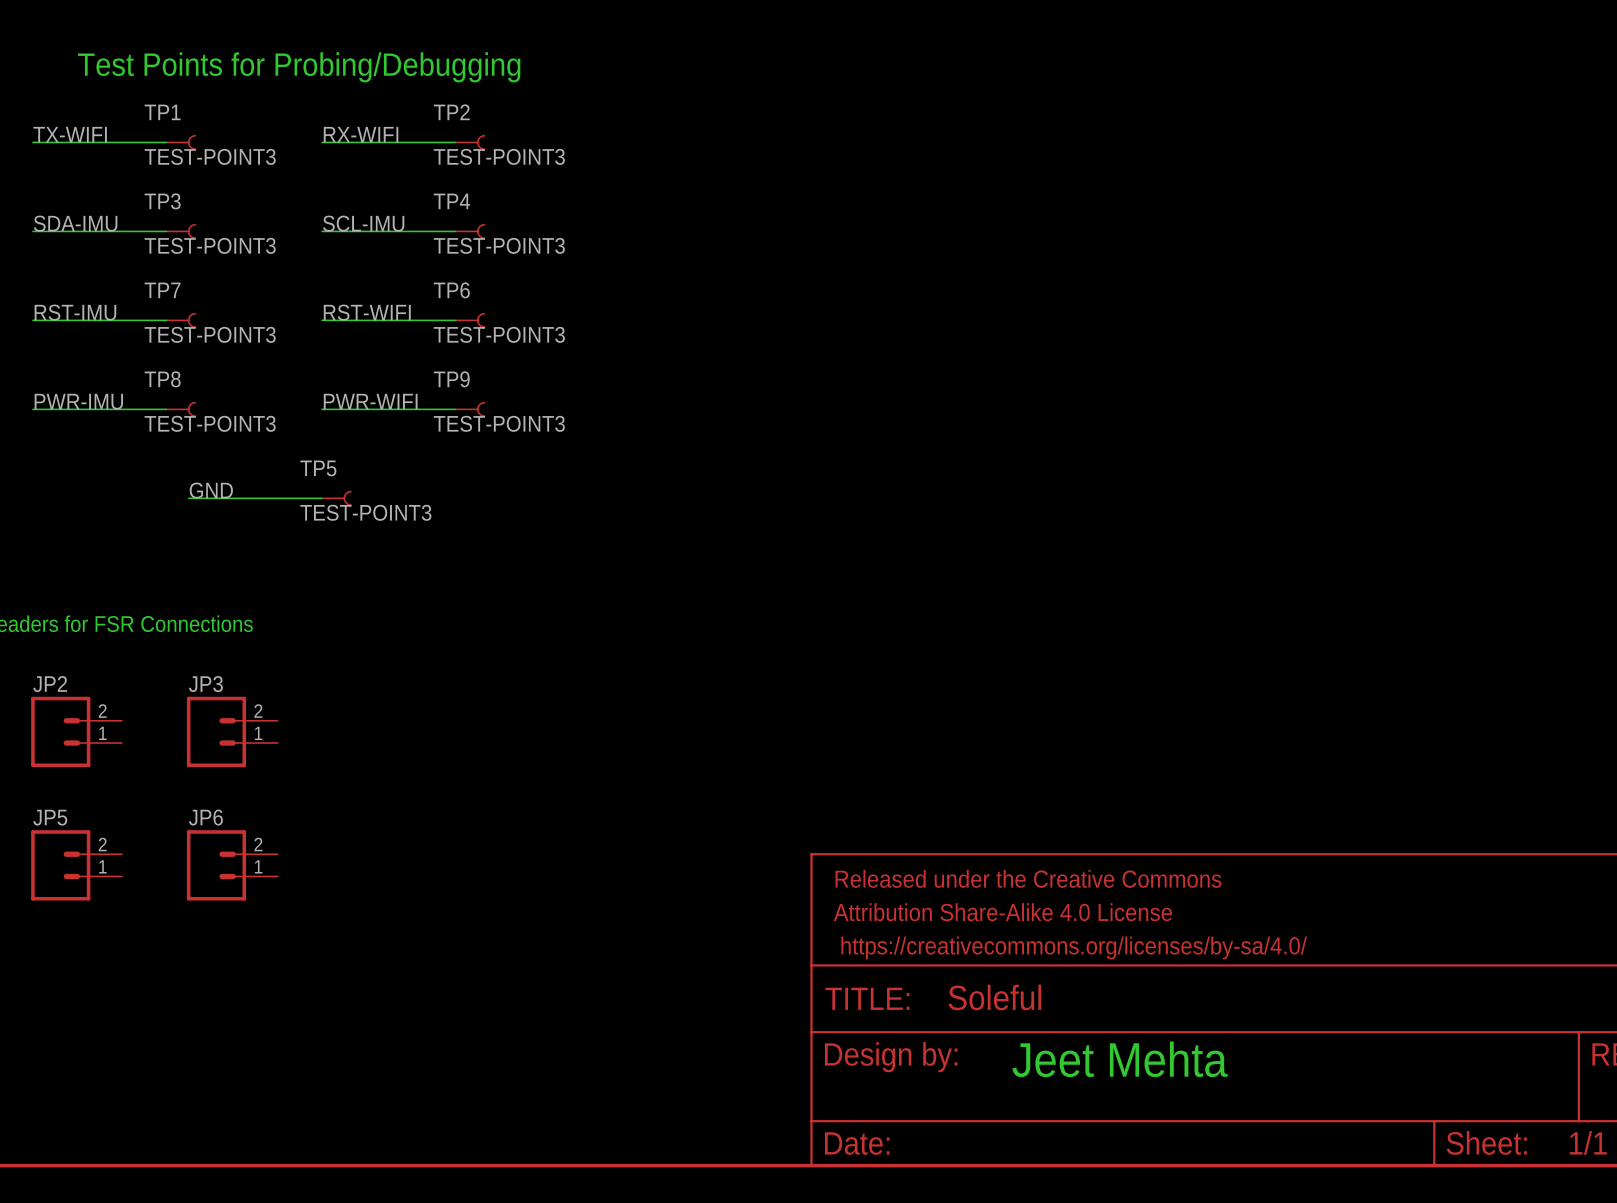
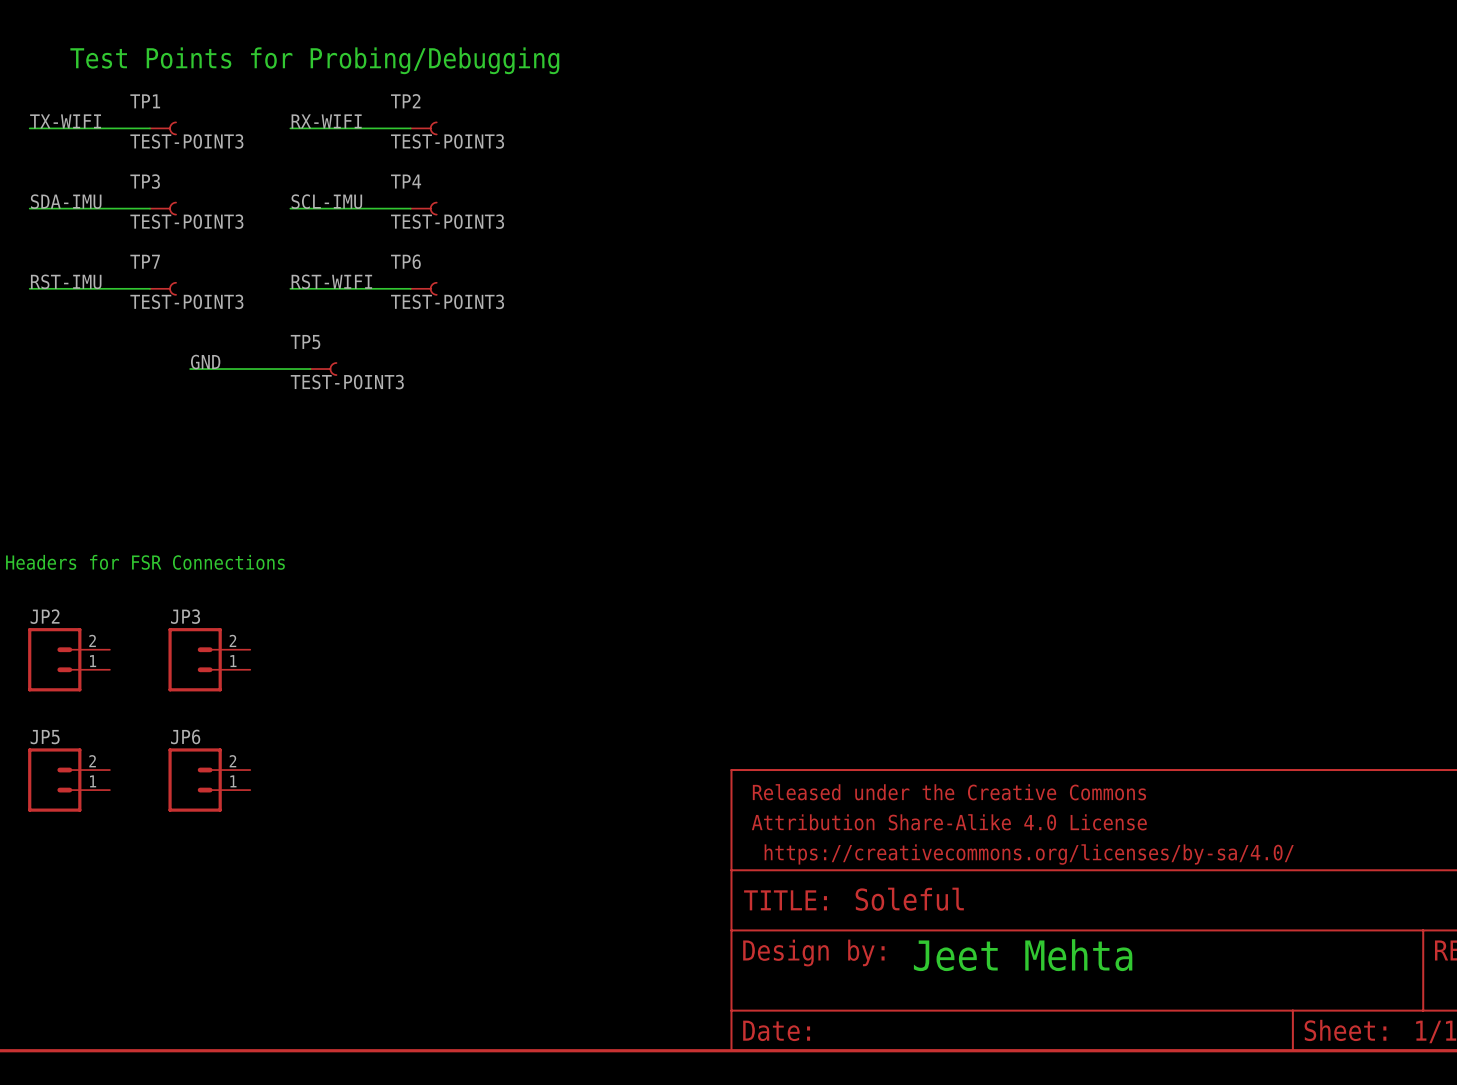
label: PWR-IMU (78, 401) -> none
label: PWR-WIFI (370, 401) -> none
wire: (32, 409) (166, 409) -> none
TP8: TEST-POINT3 (180, 409) -> none
wire: (344, 409) (455, 409) -> (190, 369) (290, 369)
TP9: TEST-POINT3 (470, 409) -> none
label position: GND (211, 490) -> GND (205, 362)
wire: (188, 498) (322, 498) -> none
TP5 position: (336, 498) -> (323, 369)

